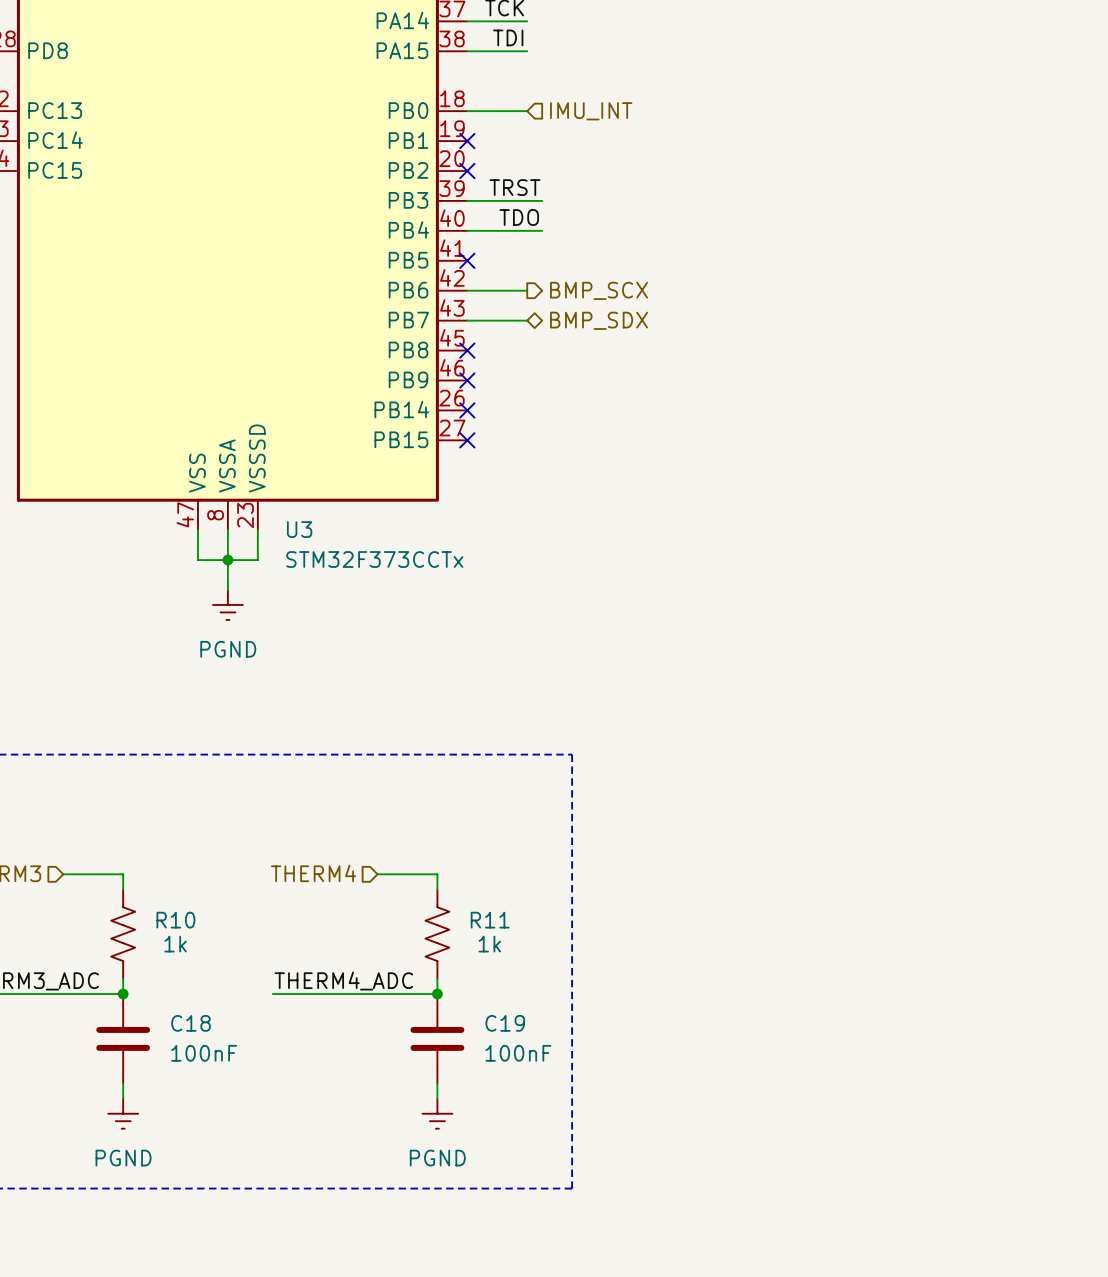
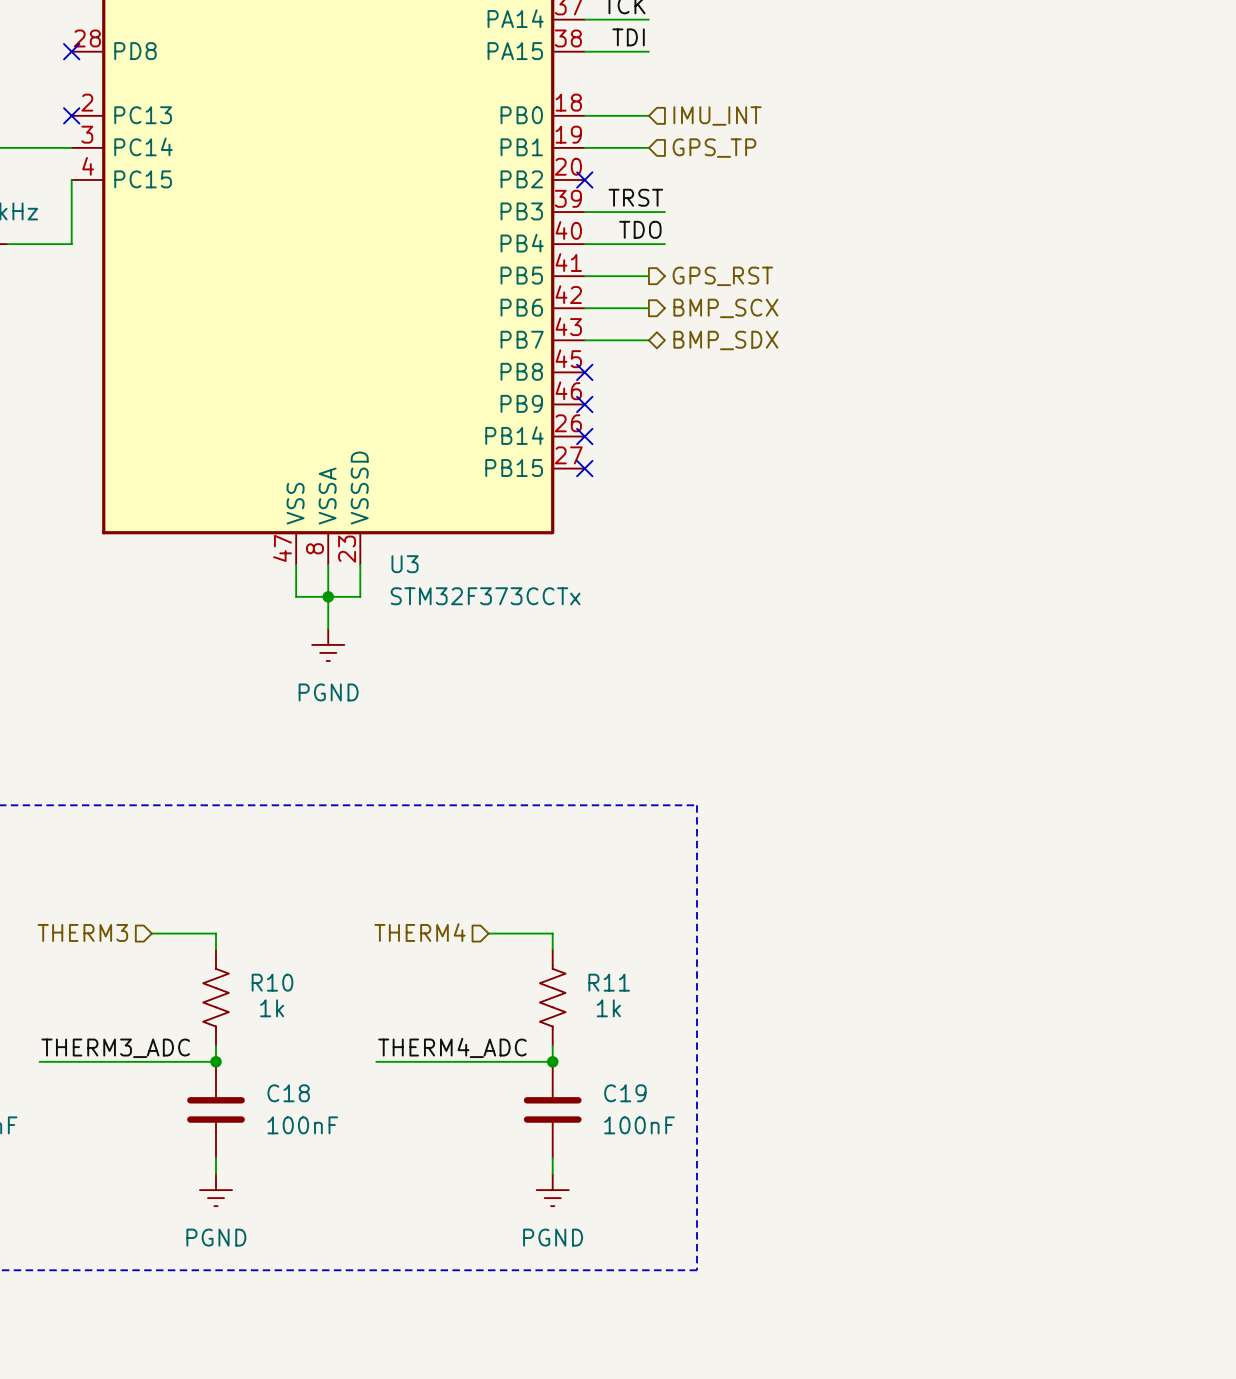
wire: none -> (584, 147) (648, 147)
no-connect mark: (467, 141) -> none
hierarchical label: none -> GPS_TP (714, 148)
wire: none -> (584, 276) (648, 276)
no-connect mark: (467, 260) -> none
hierarchical label: none -> GPS_RST (722, 276)

